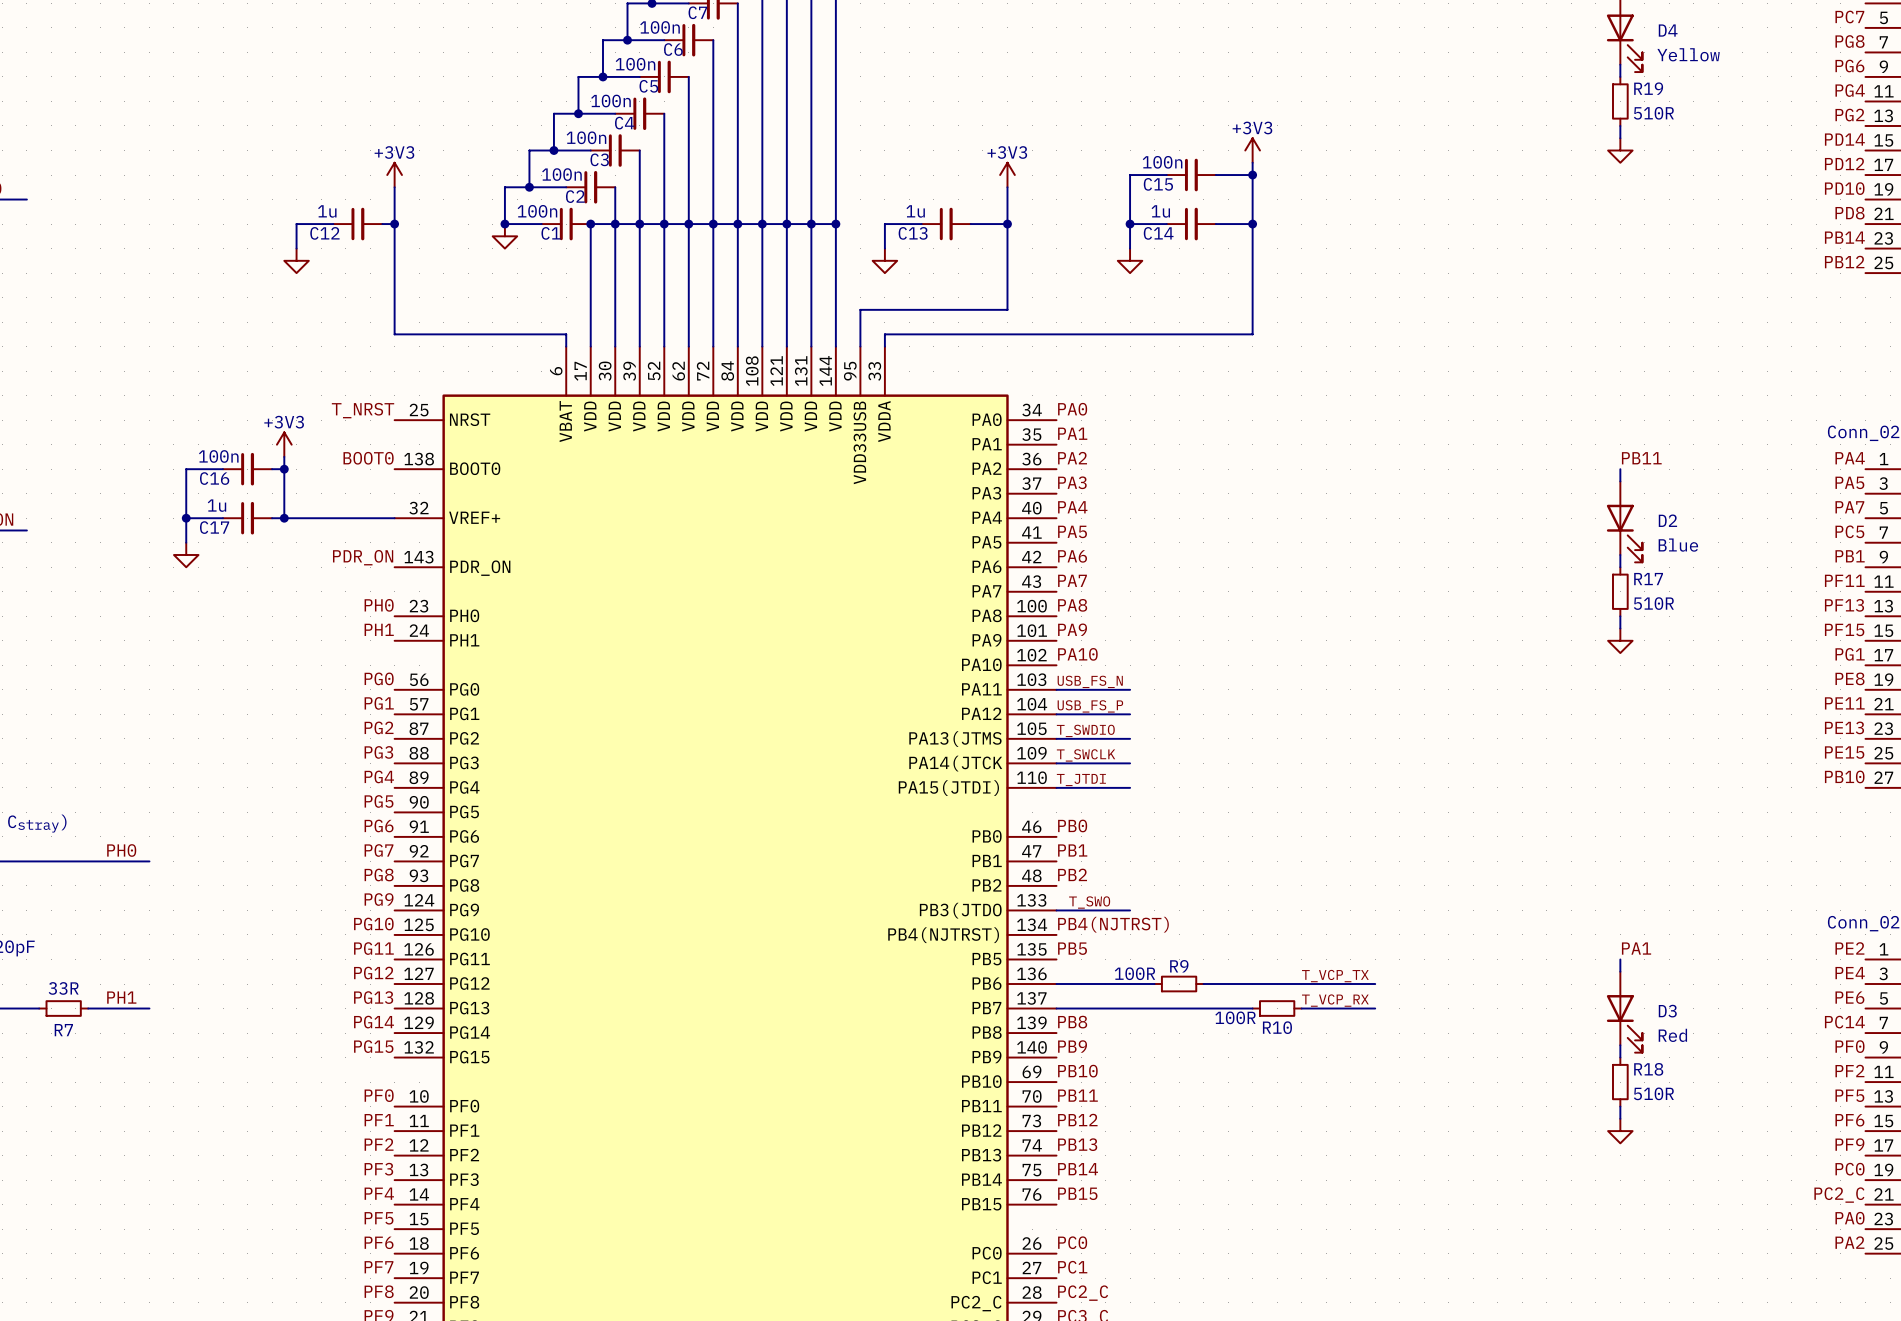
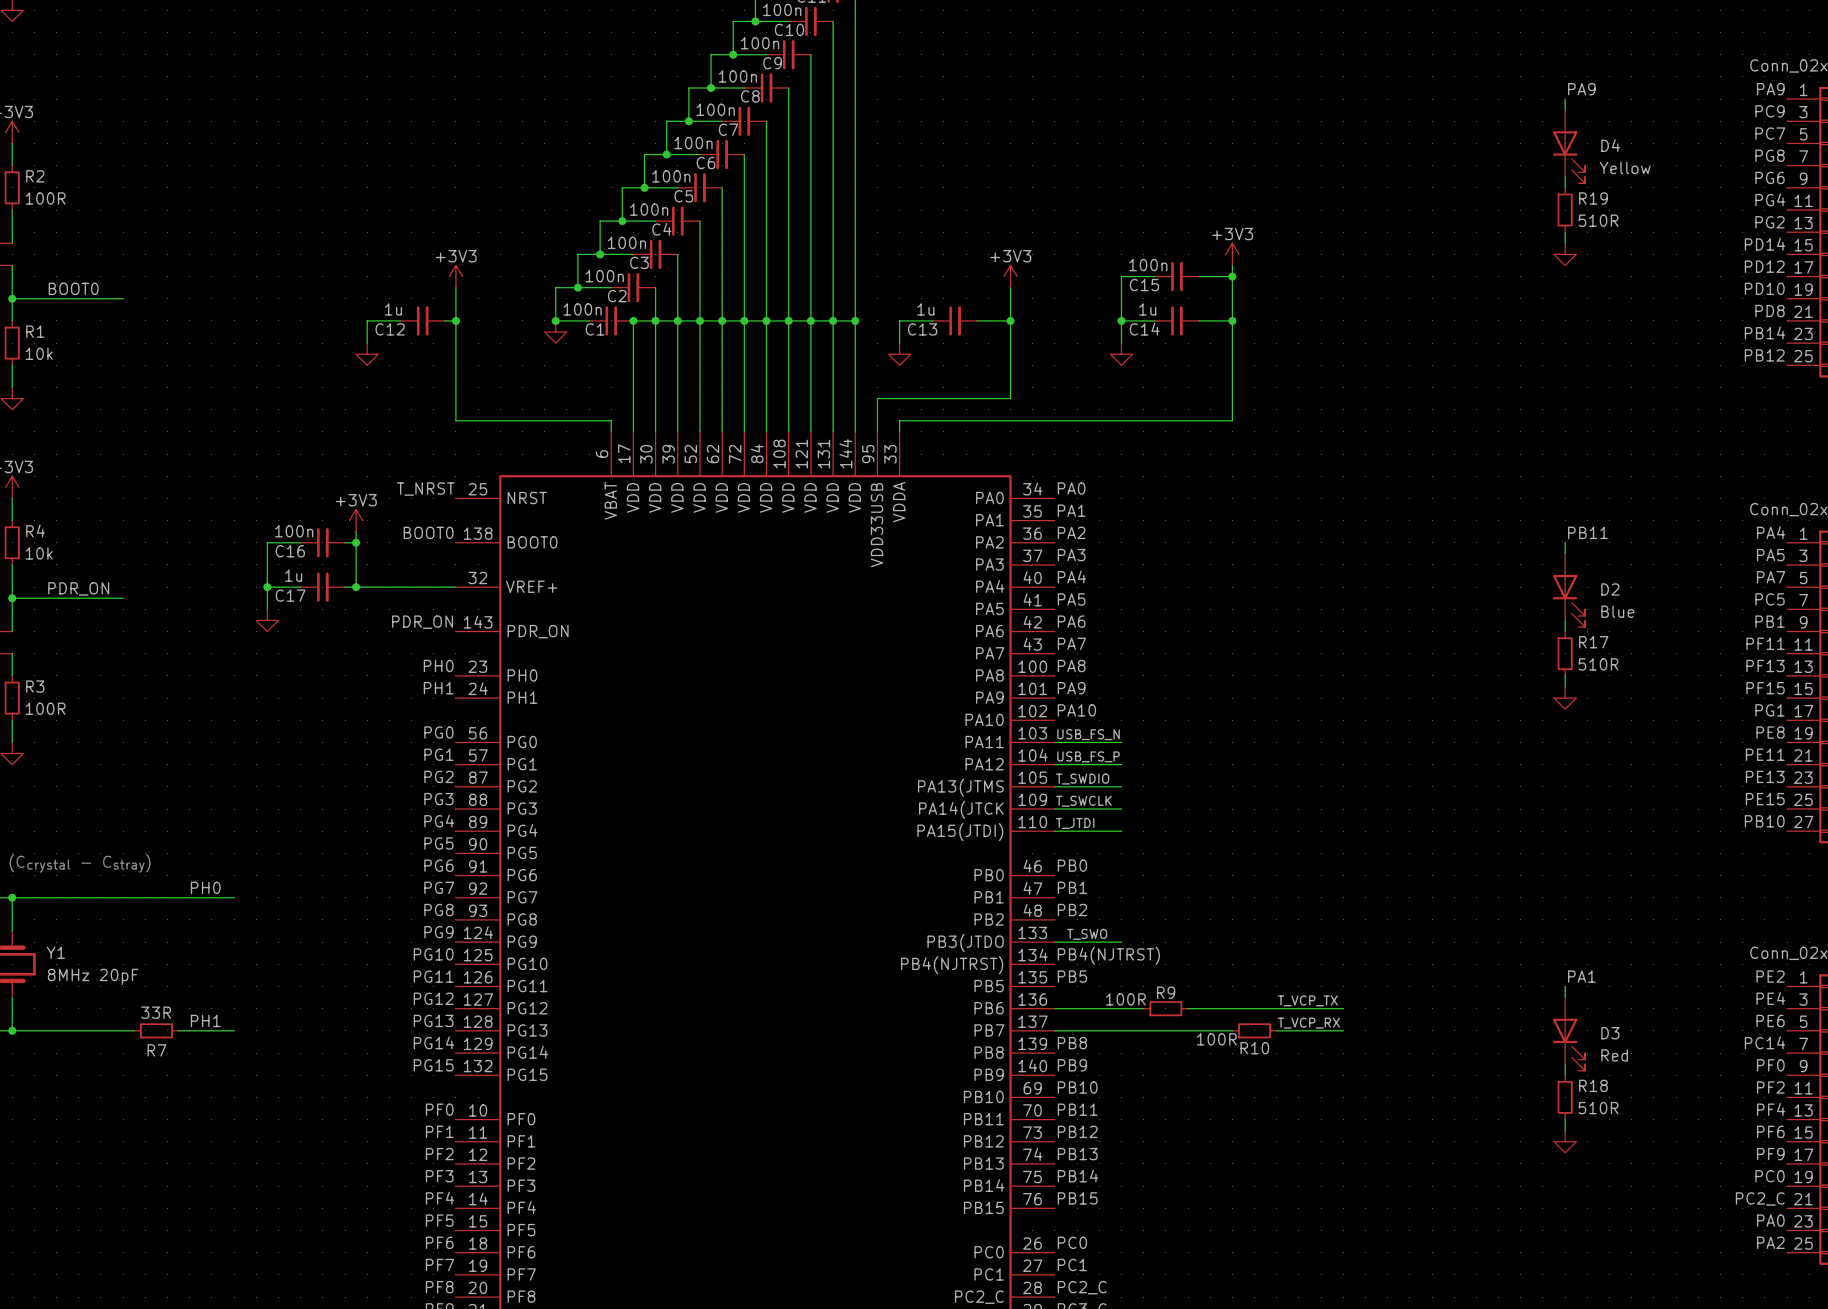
label: PF5 (1849, 1095) -> PF4 (1771, 1109)

